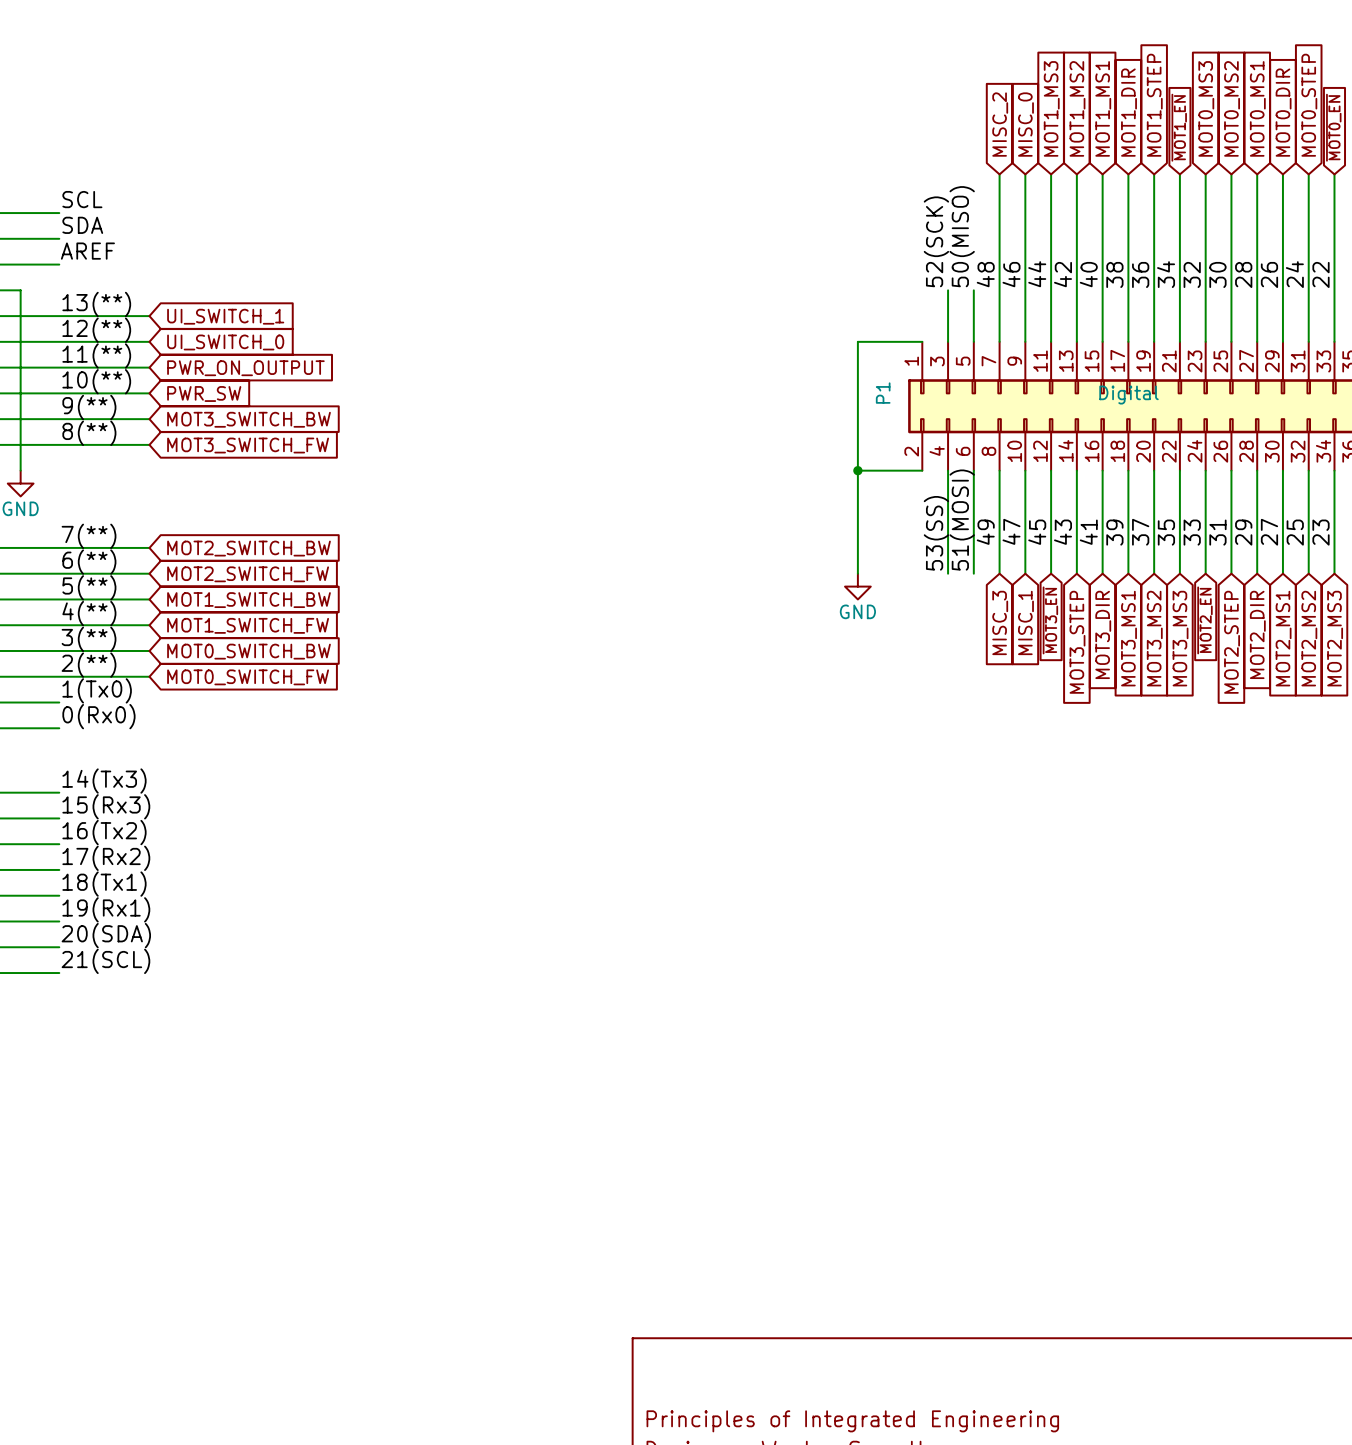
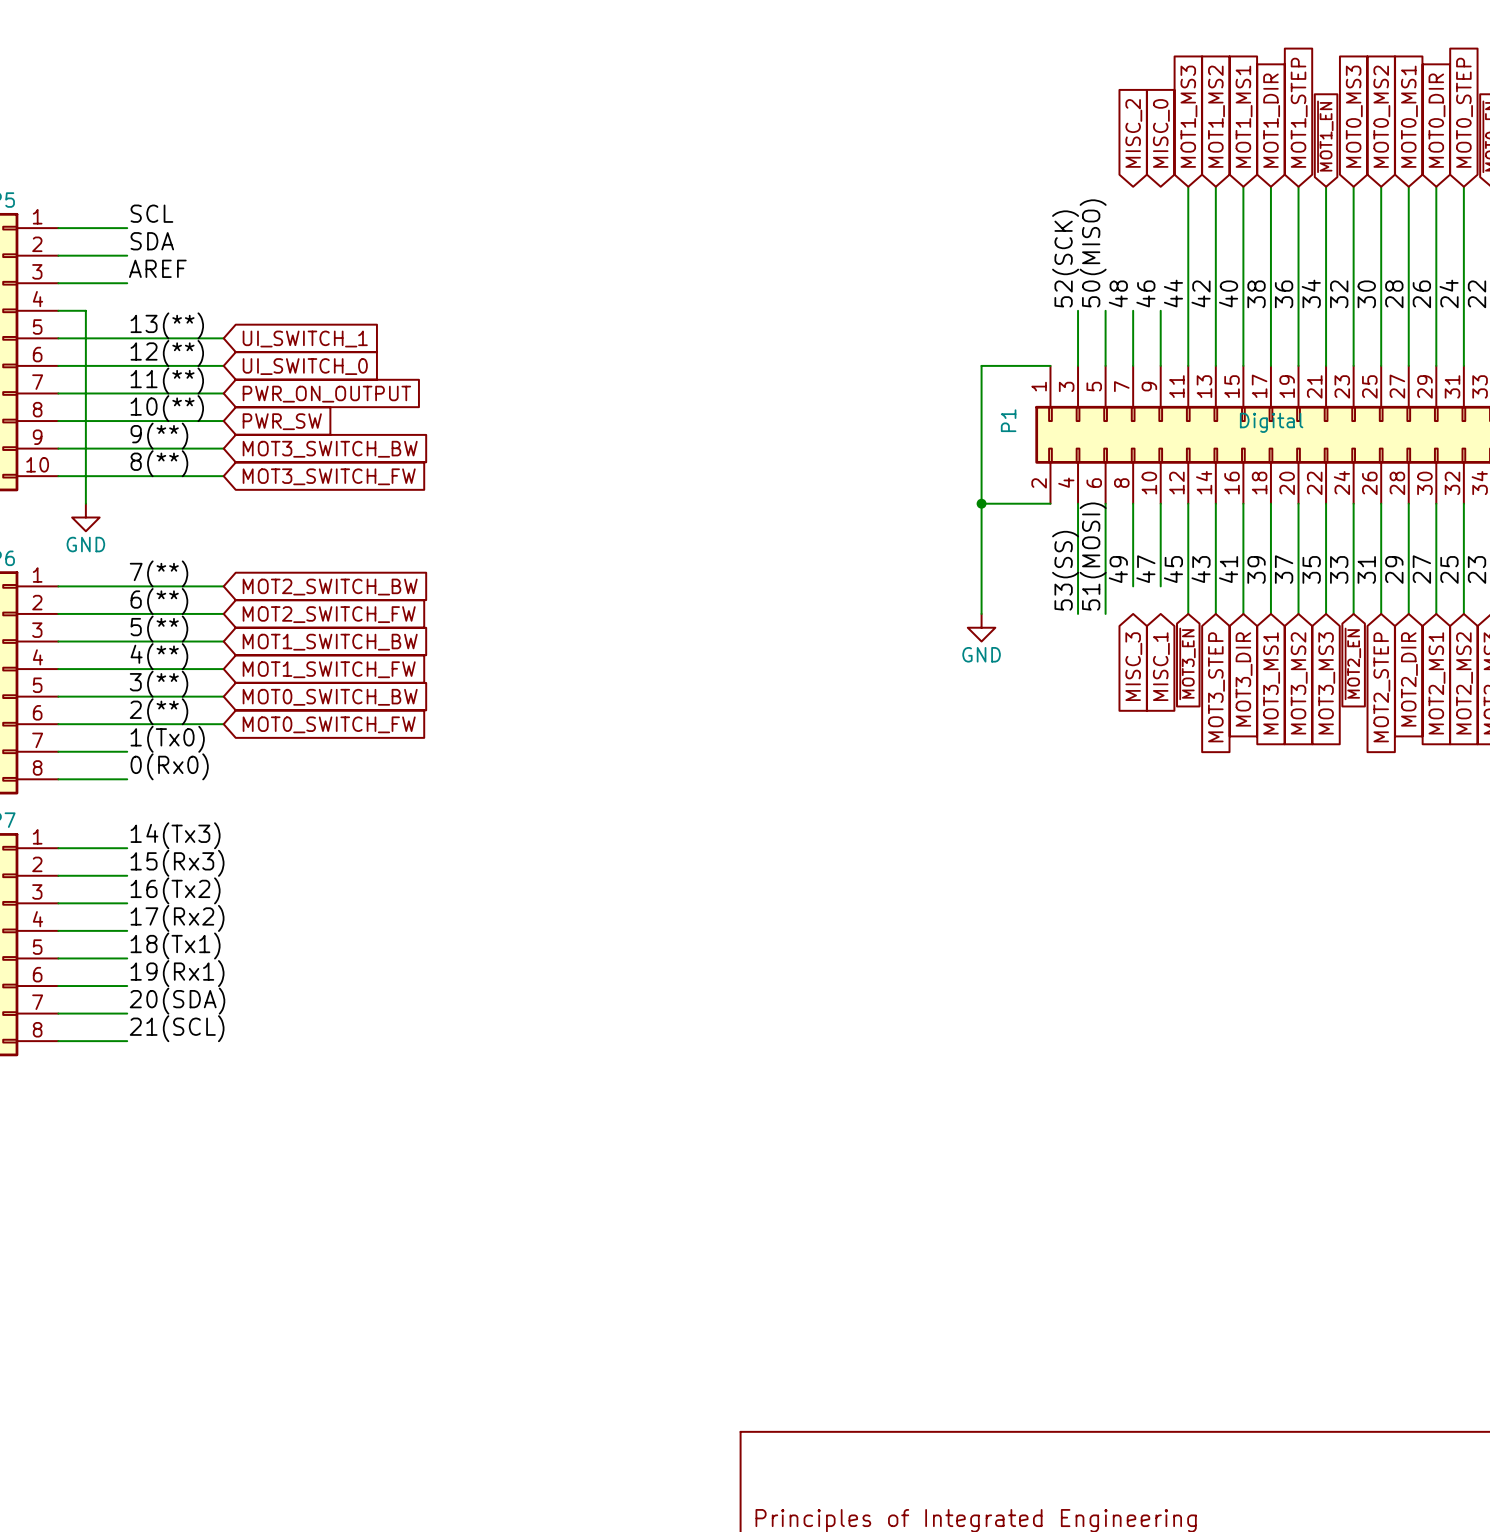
wire: (999, 174) (999, 290) -> none
wire: (1025, 174) (1025, 290) -> none
wire: (999, 547) (999, 573) -> none
wire: (1025, 547) (1025, 573) -> none

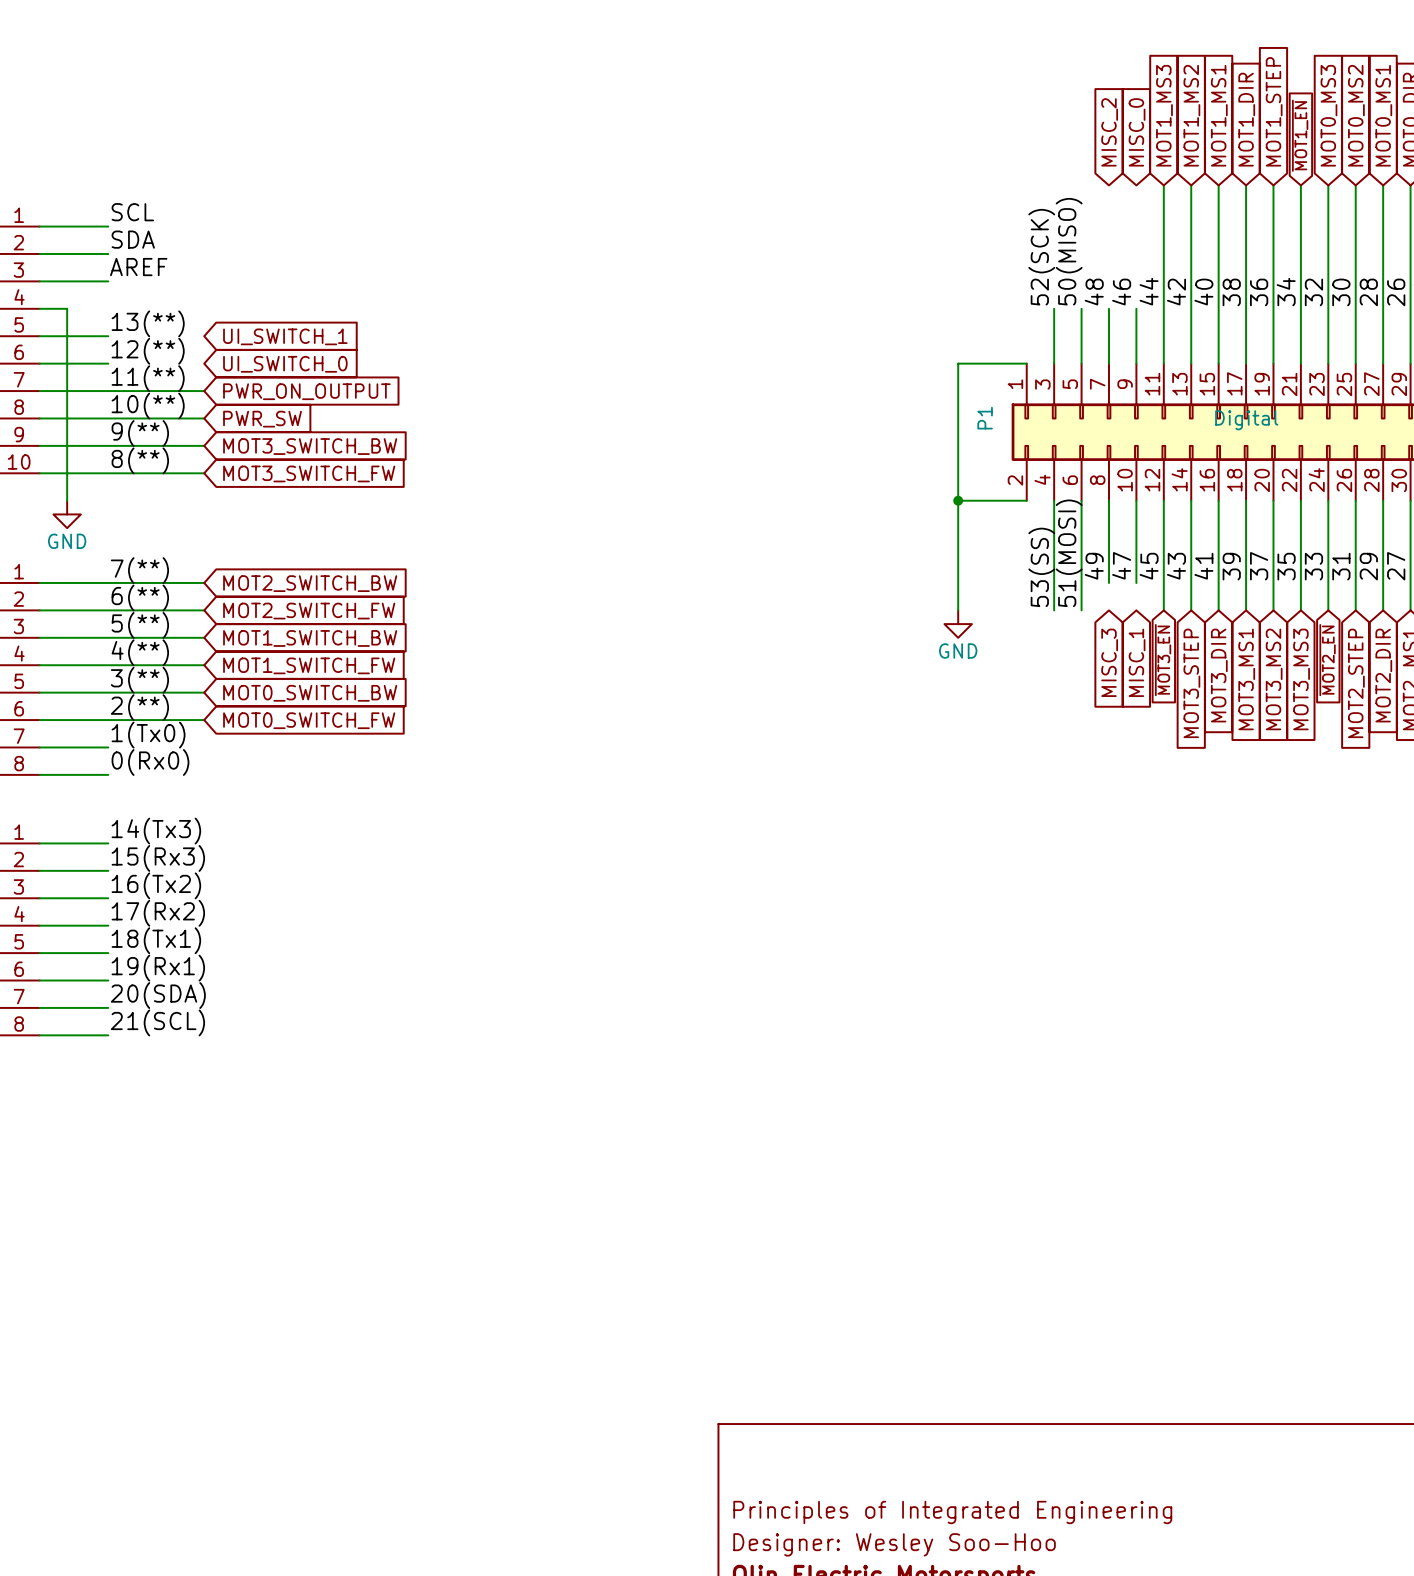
wire: (127, 338) (223, 338) -> none
wire: (127, 365) (223, 365) -> none

